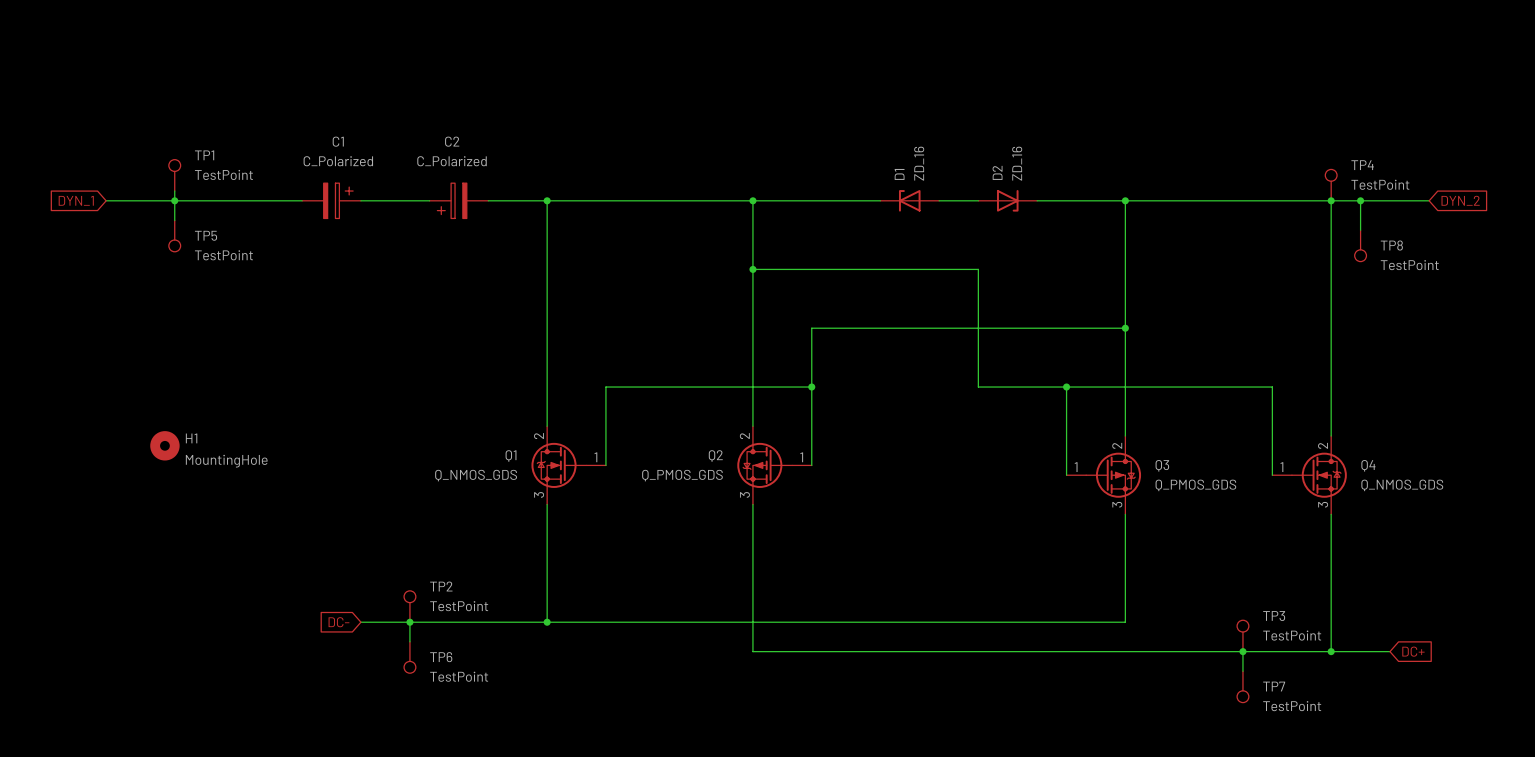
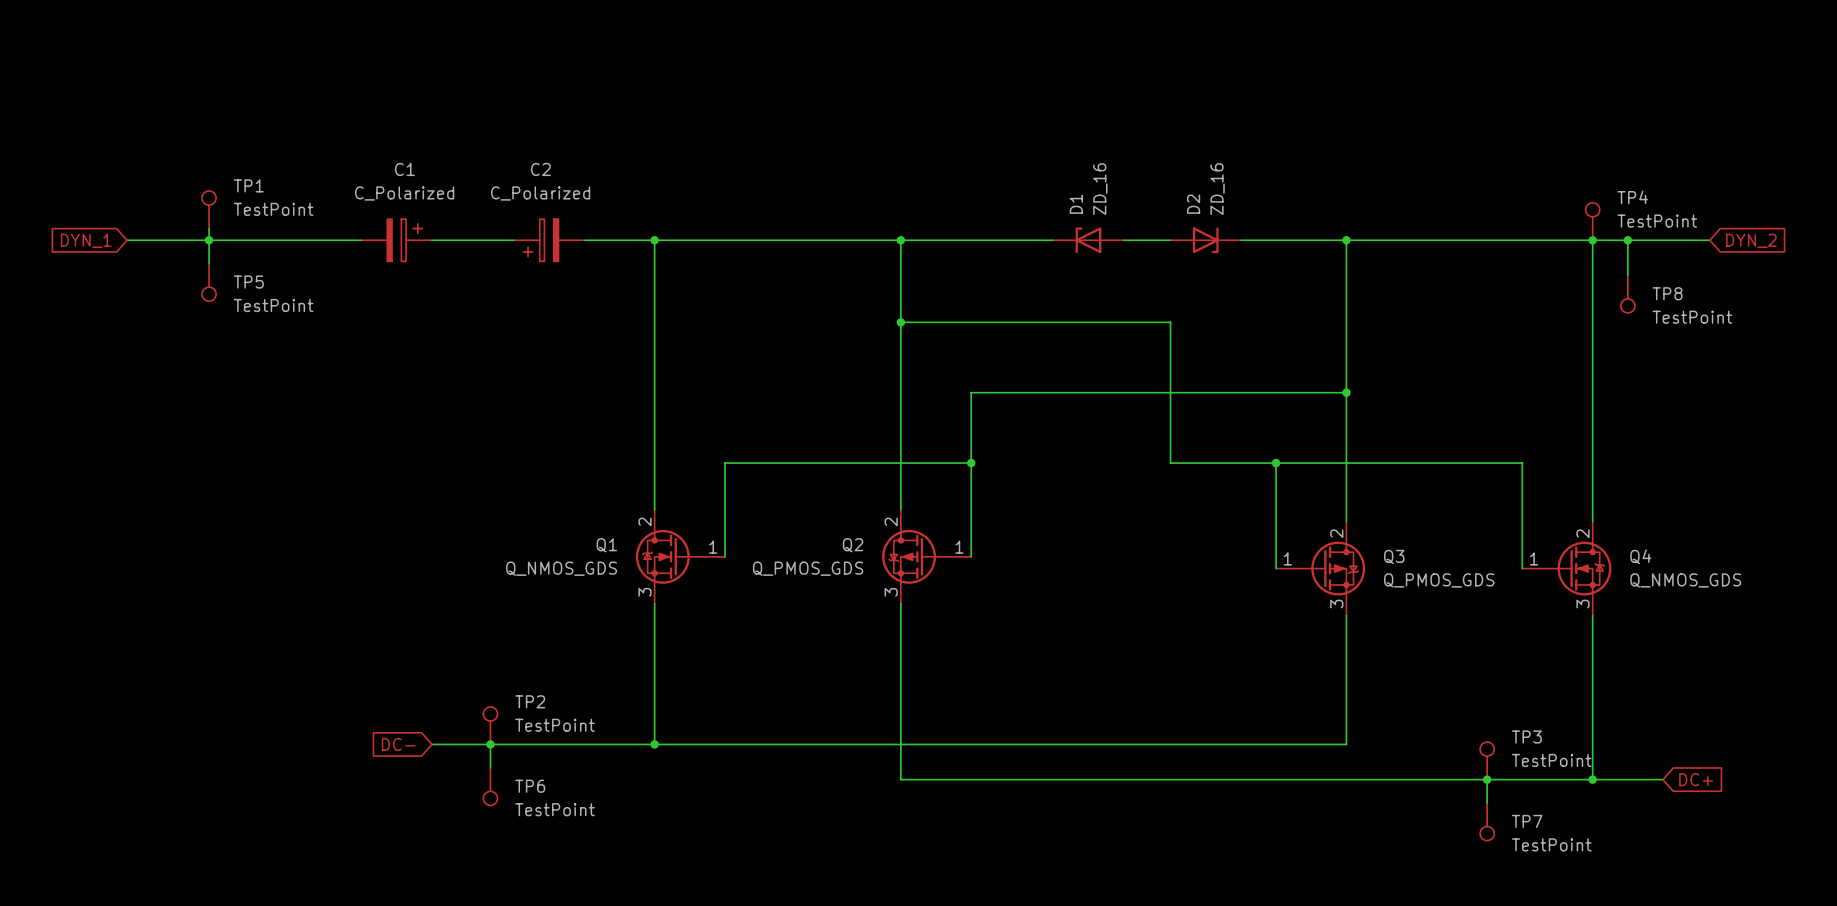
H1: MountingHole (164, 445) -> none

